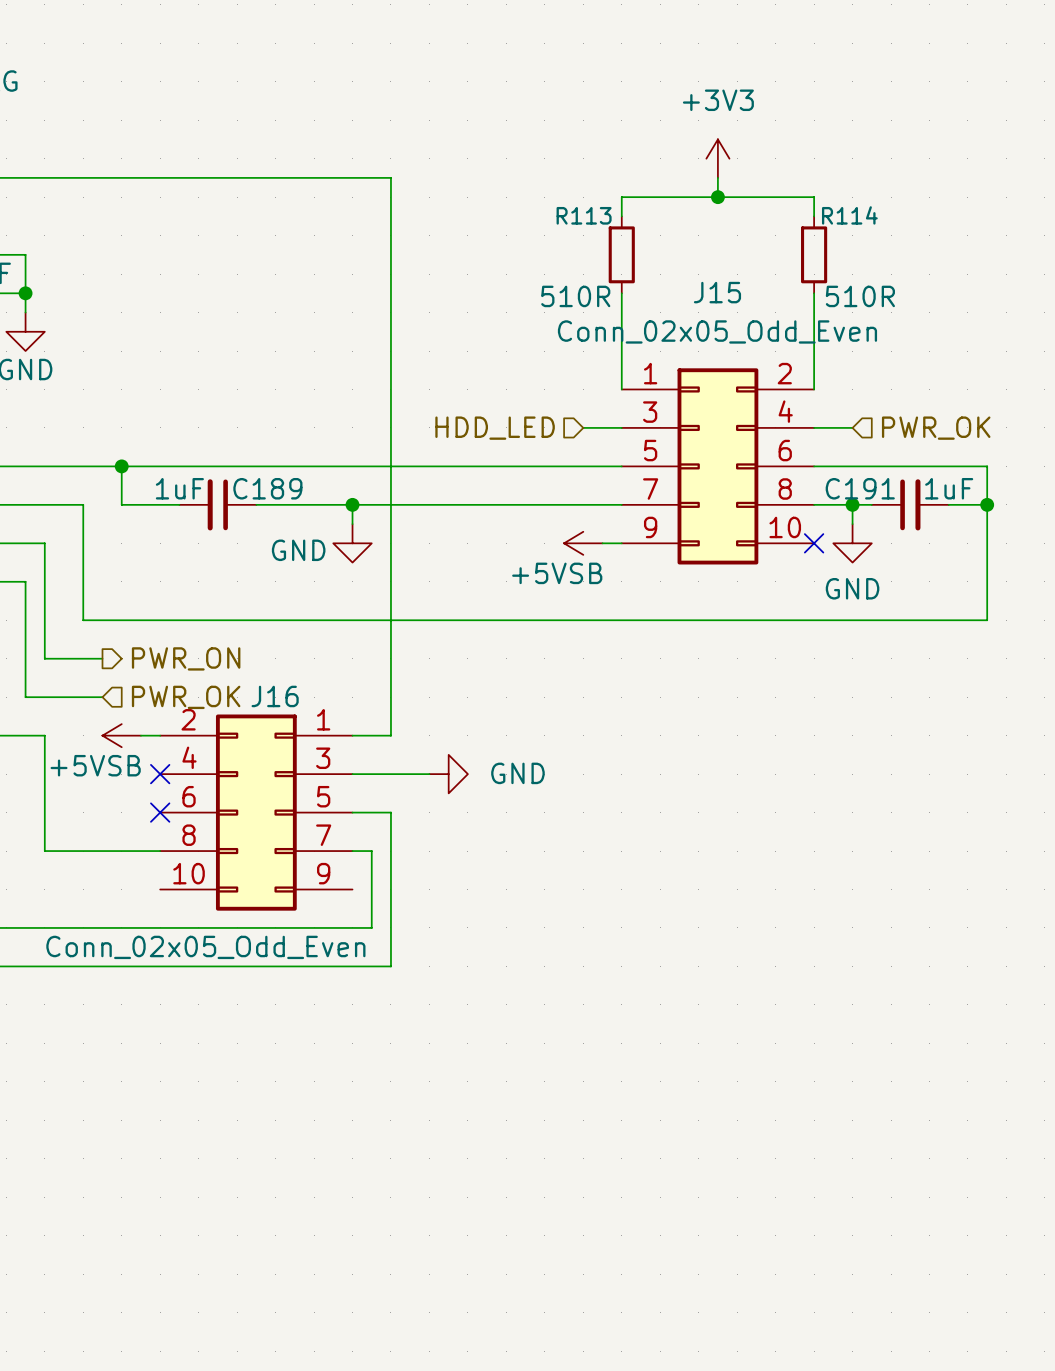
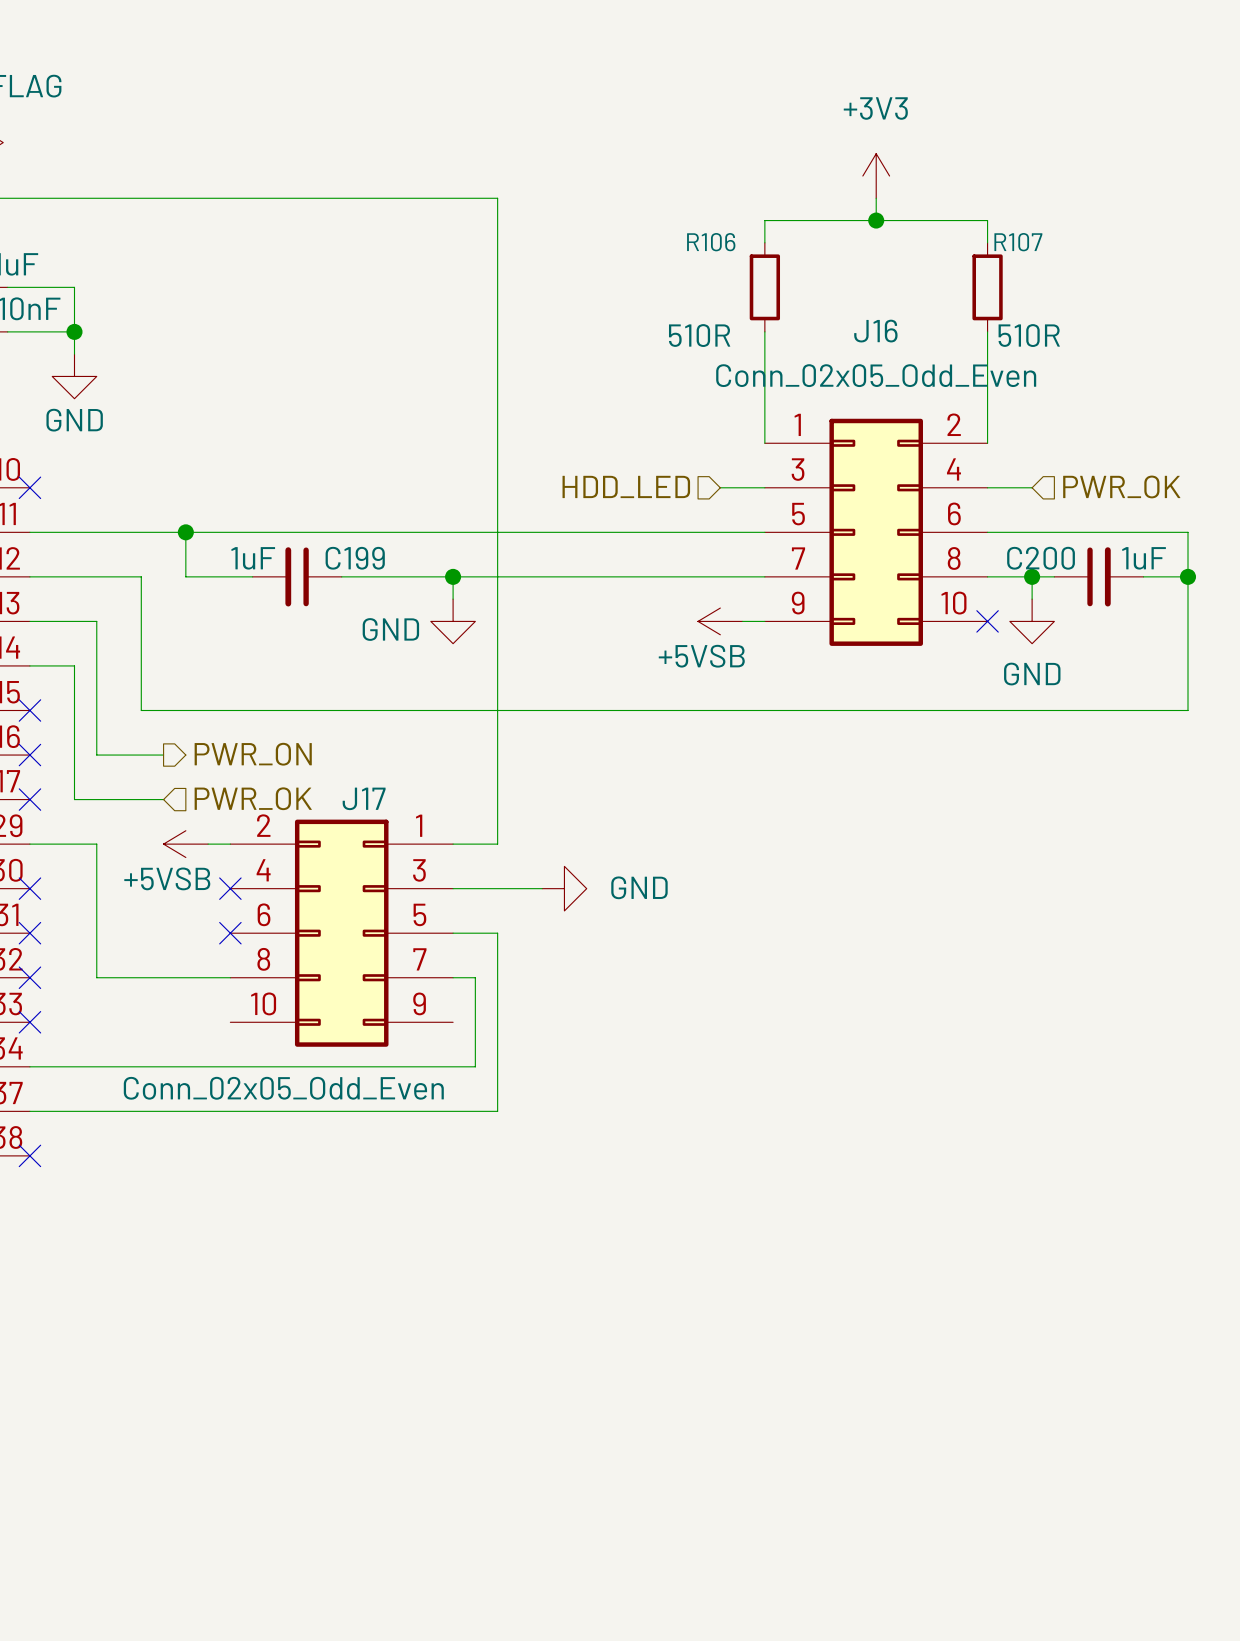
R113 name: R113 (584, 215) -> R106 (711, 242)
R114 name: R114 (849, 215) -> R107 (1018, 242)
J15 name: J15 (717, 292) -> J16 (875, 331)
C189 name: C189 (267, 488) -> C199 (355, 558)
C191 name: C191 (860, 488) -> C200 (1041, 558)
J16 name: J16 (275, 696) -> J17 (364, 798)

